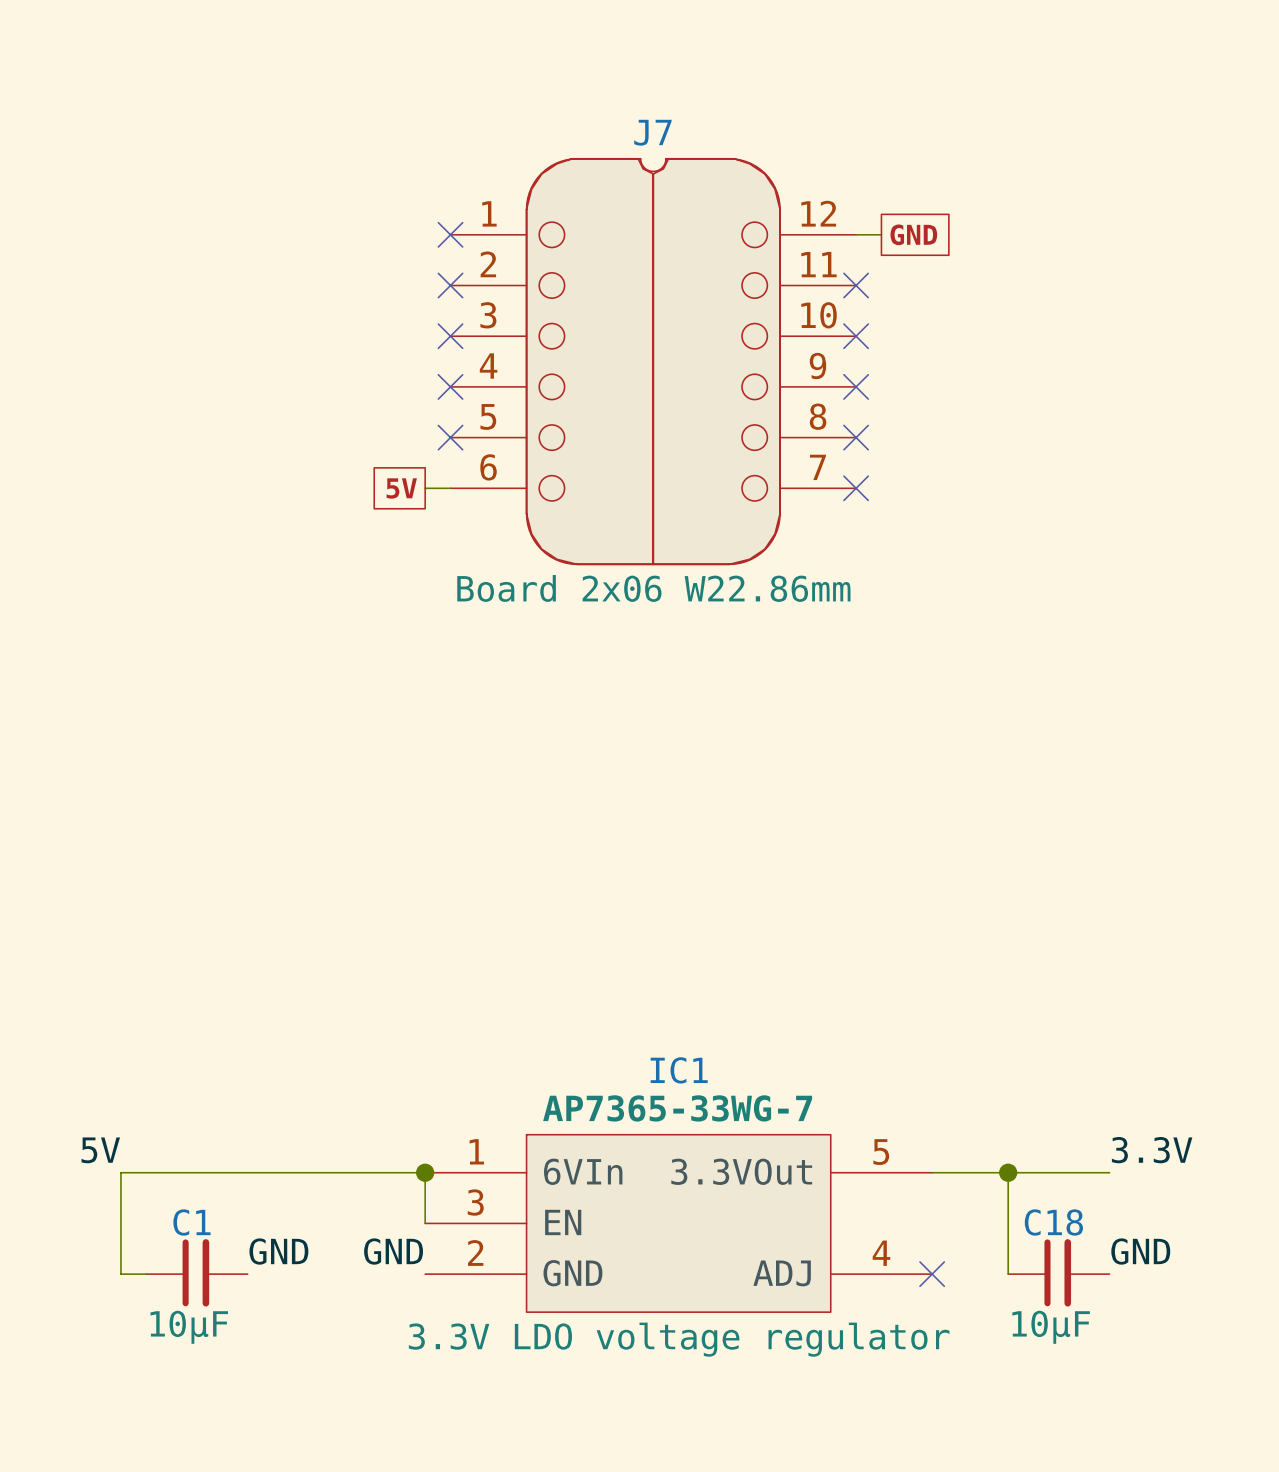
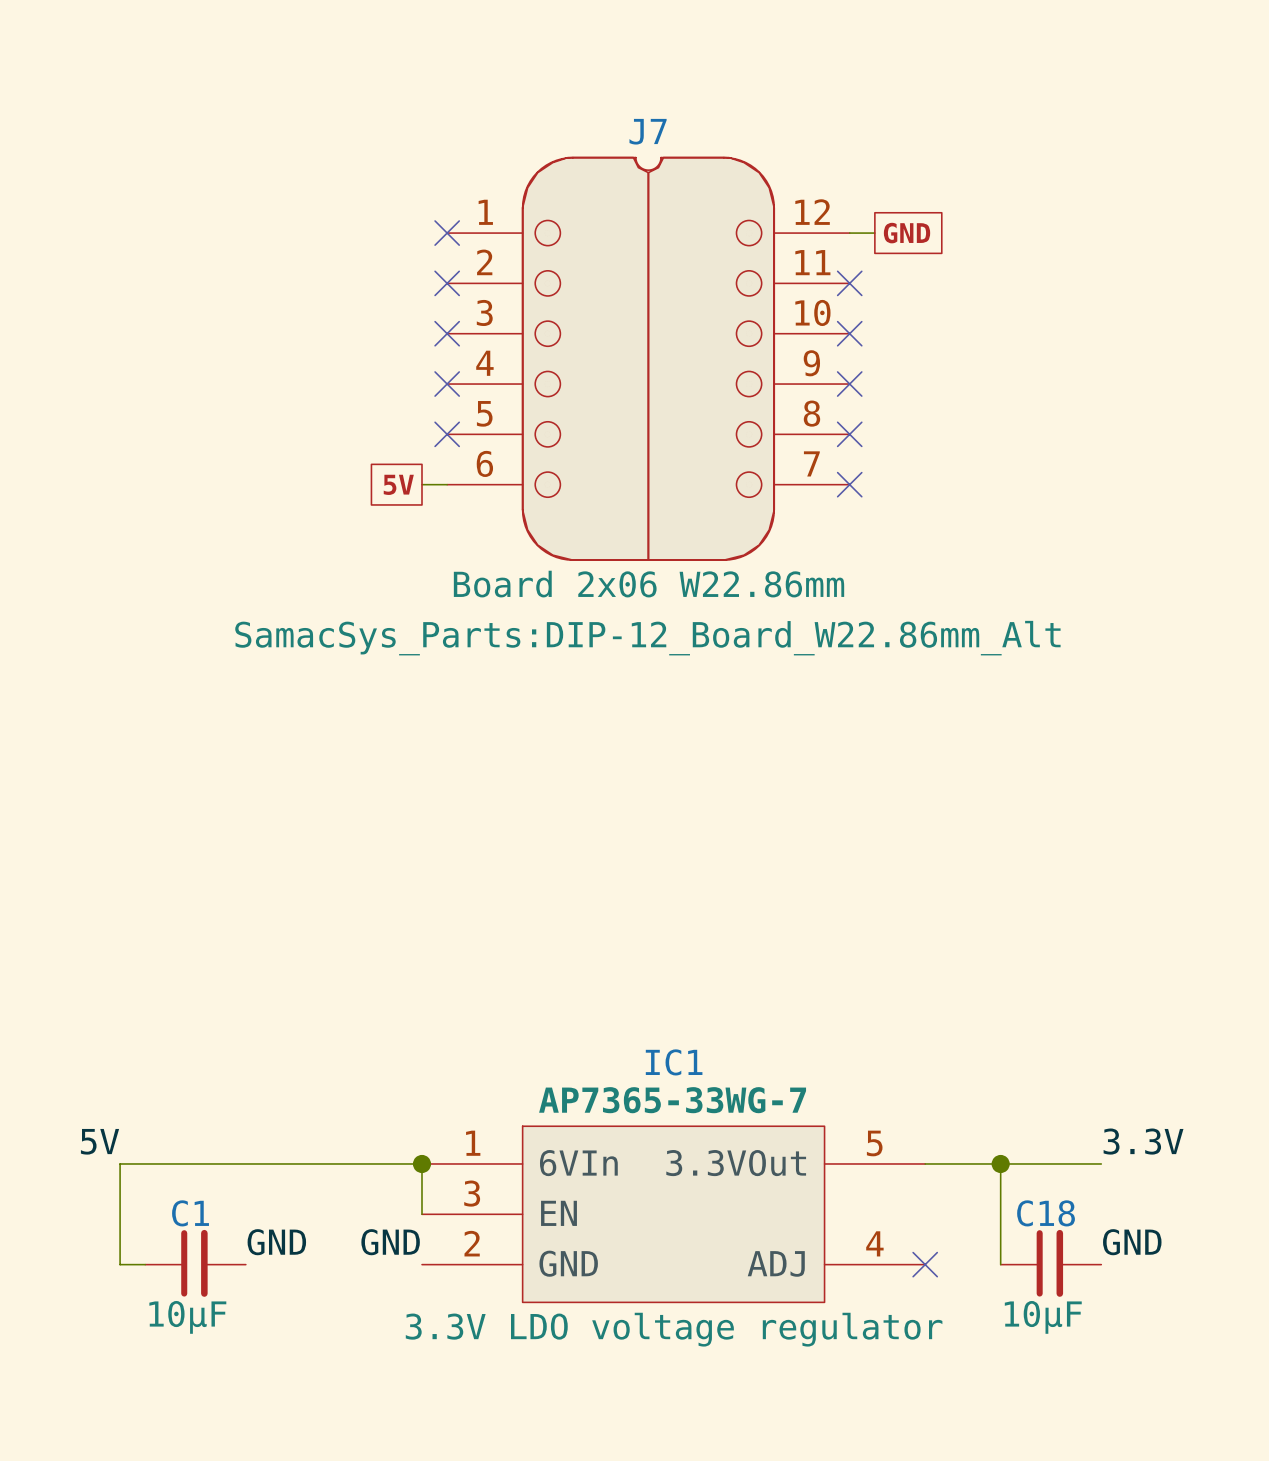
J7 text: none -> SamacSys_Parts:DIP-12_Board_W22.86mm_Alt (647, 638)

